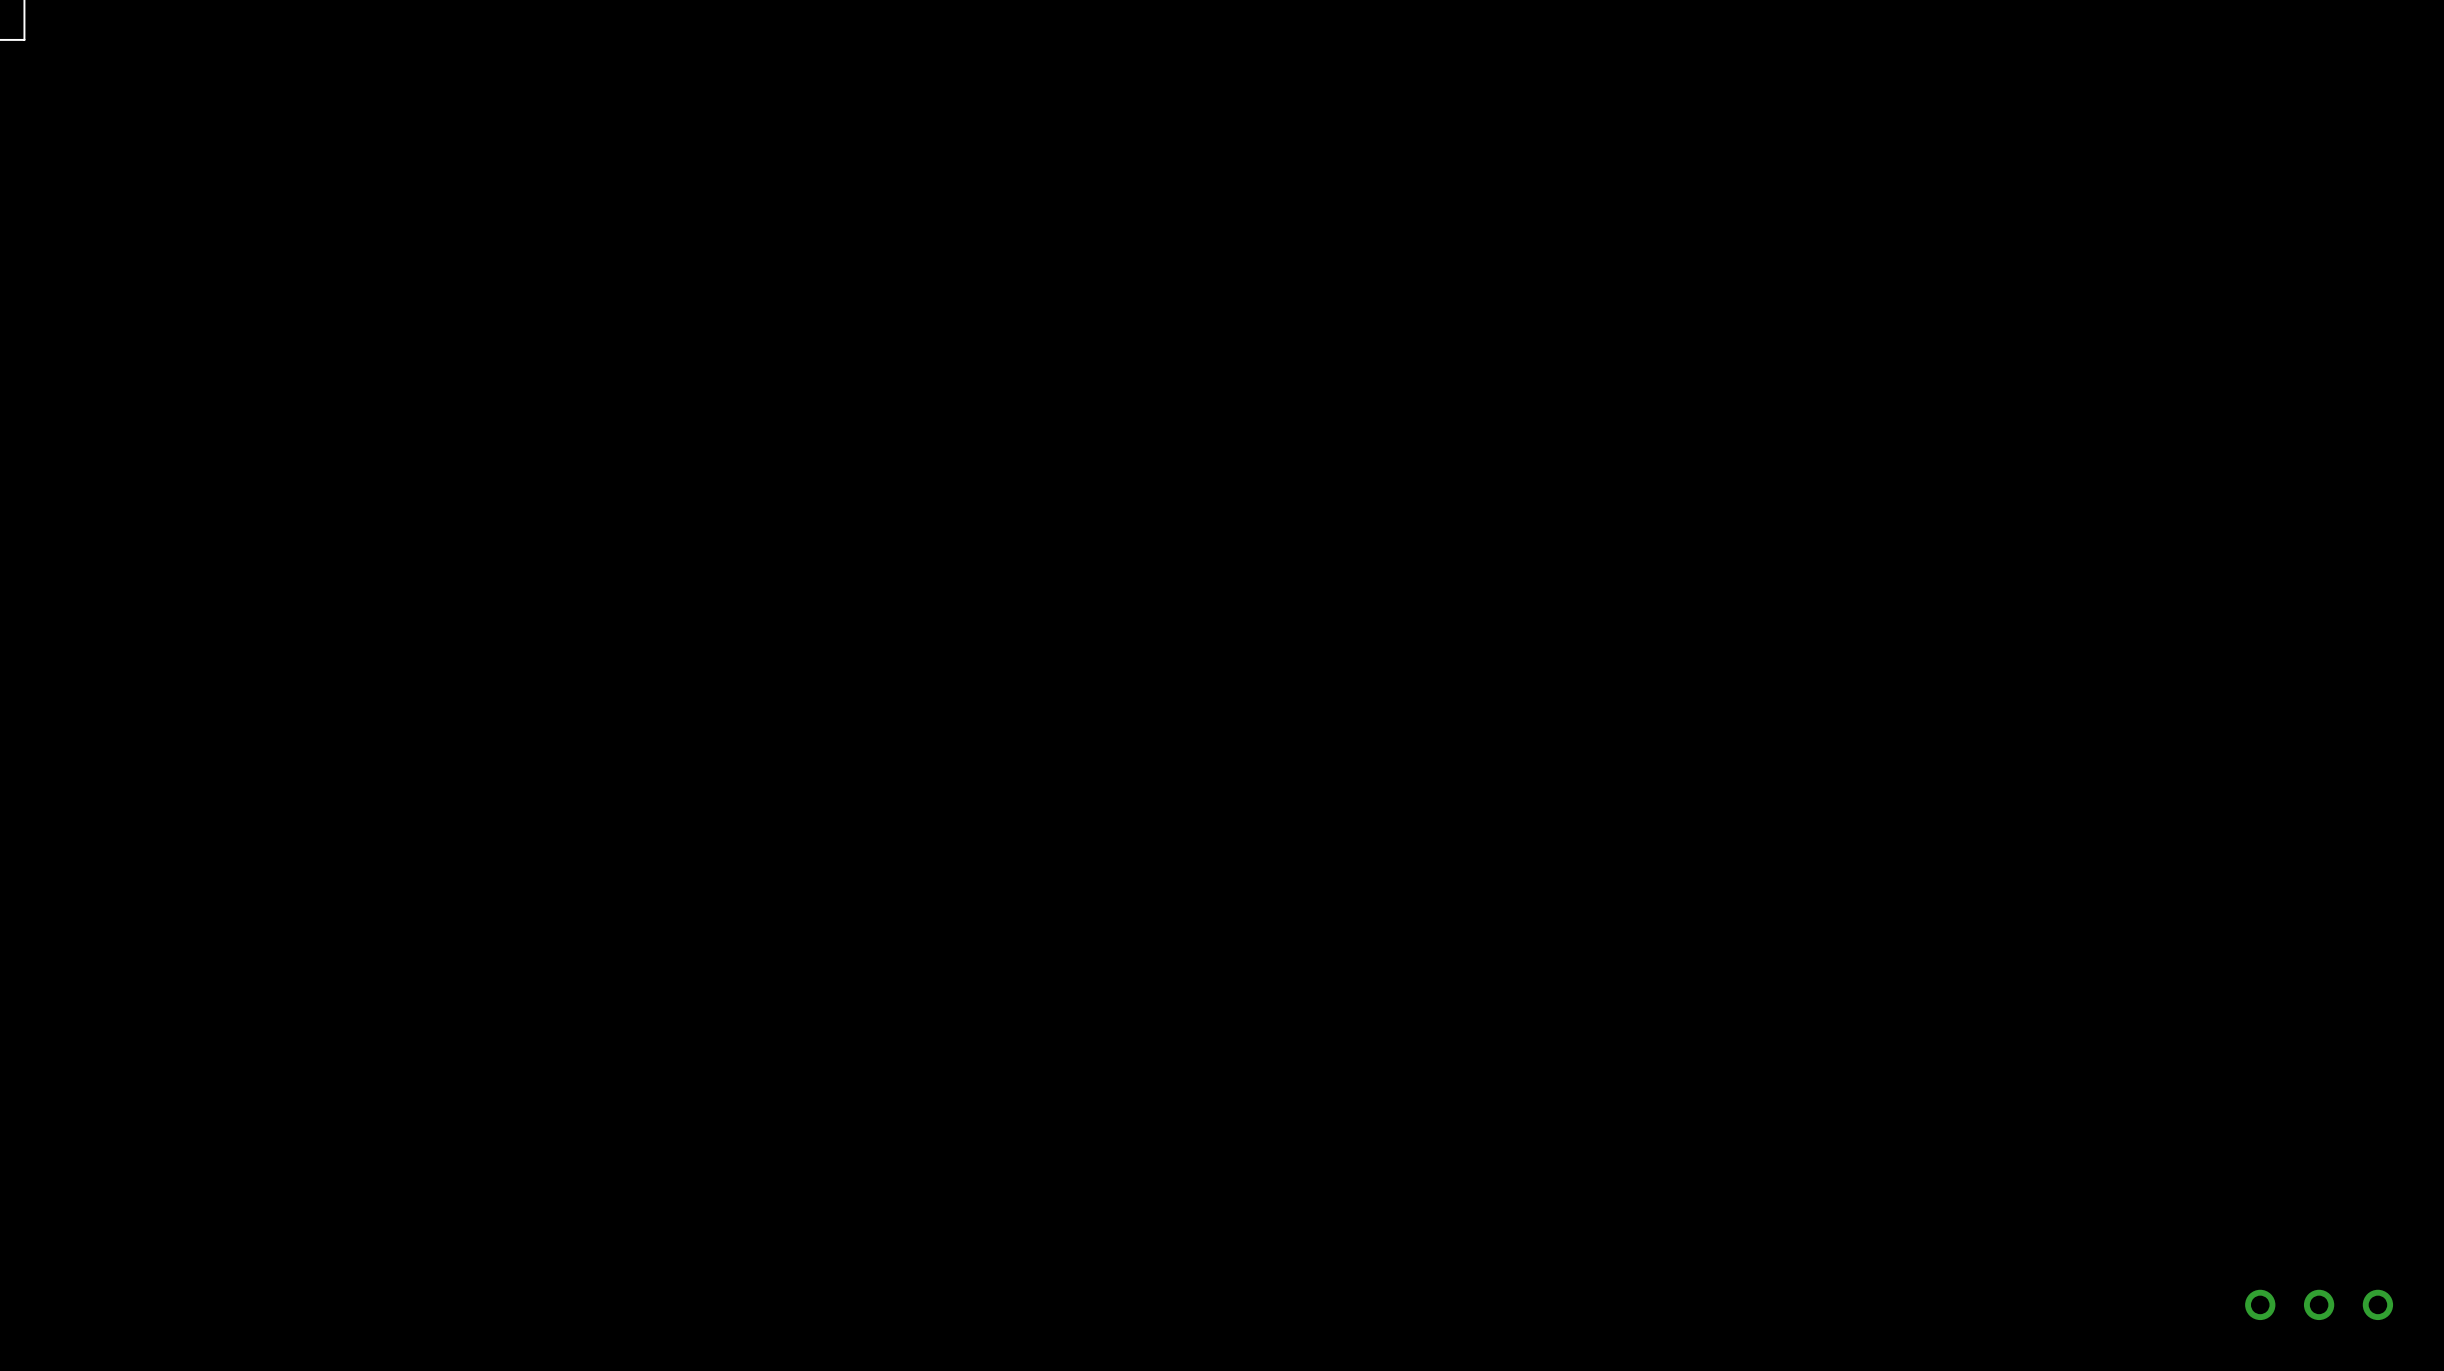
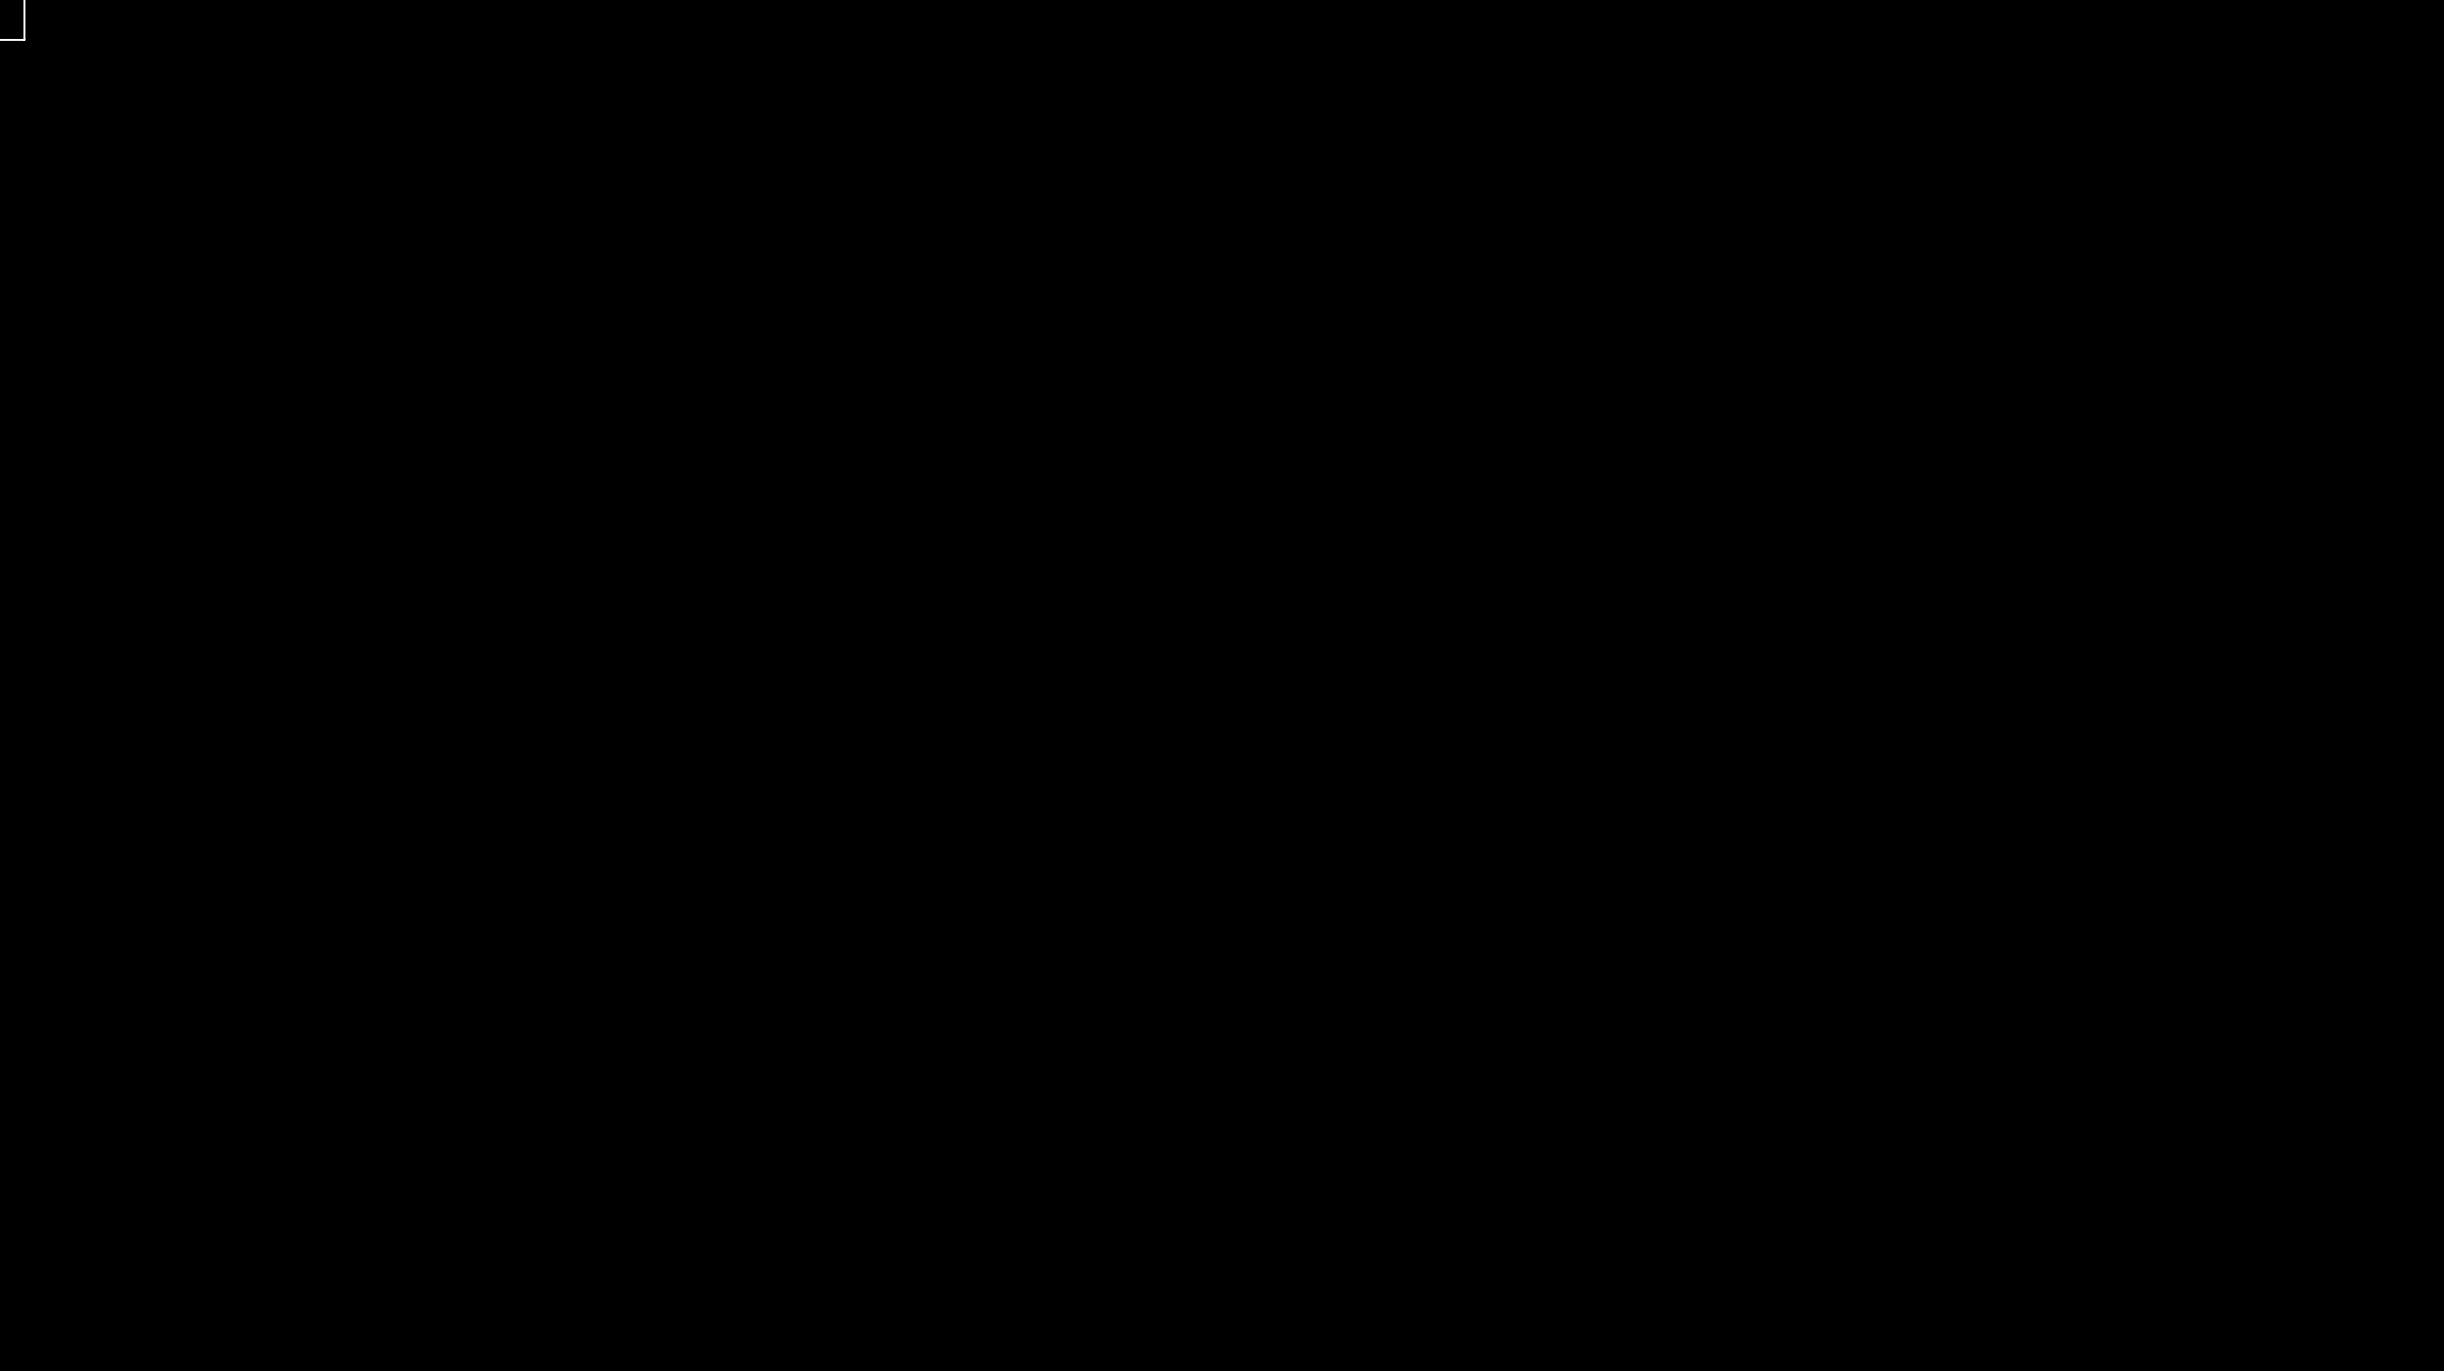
part: (2319, 1304) -> none

